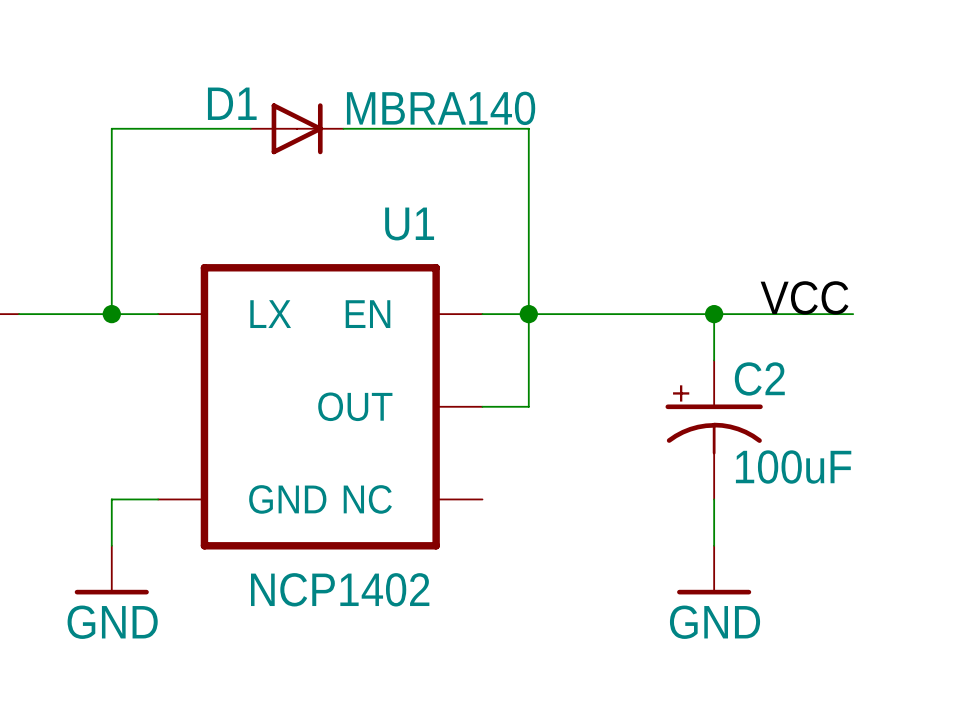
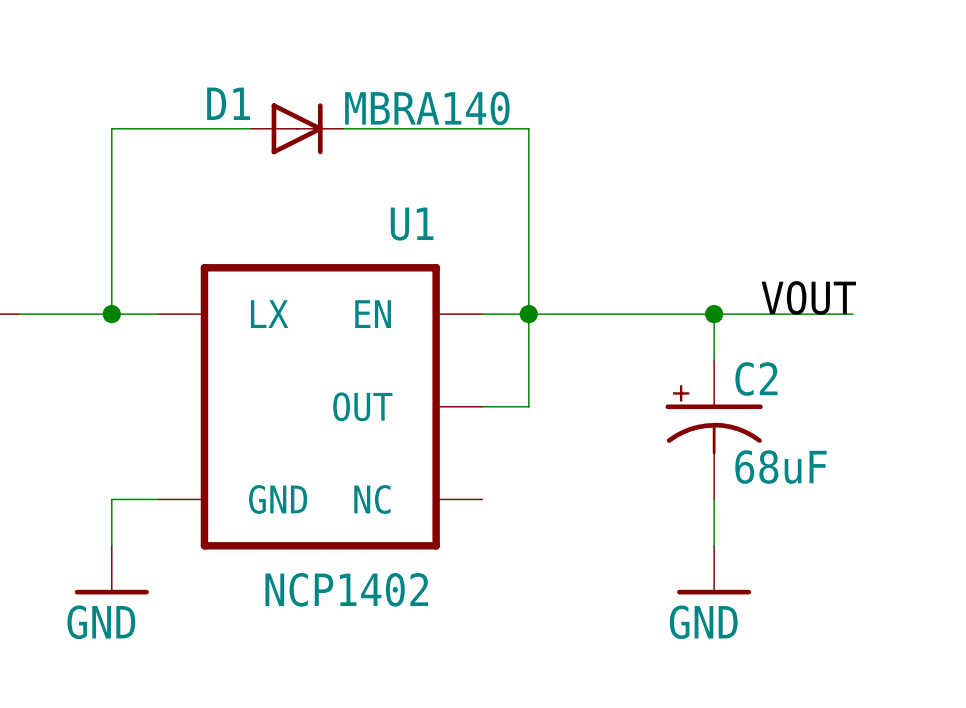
label: VCC (804, 297) -> VOUT (808, 297)
C2 value: 100uF (793, 467) -> 68uF (781, 467)

